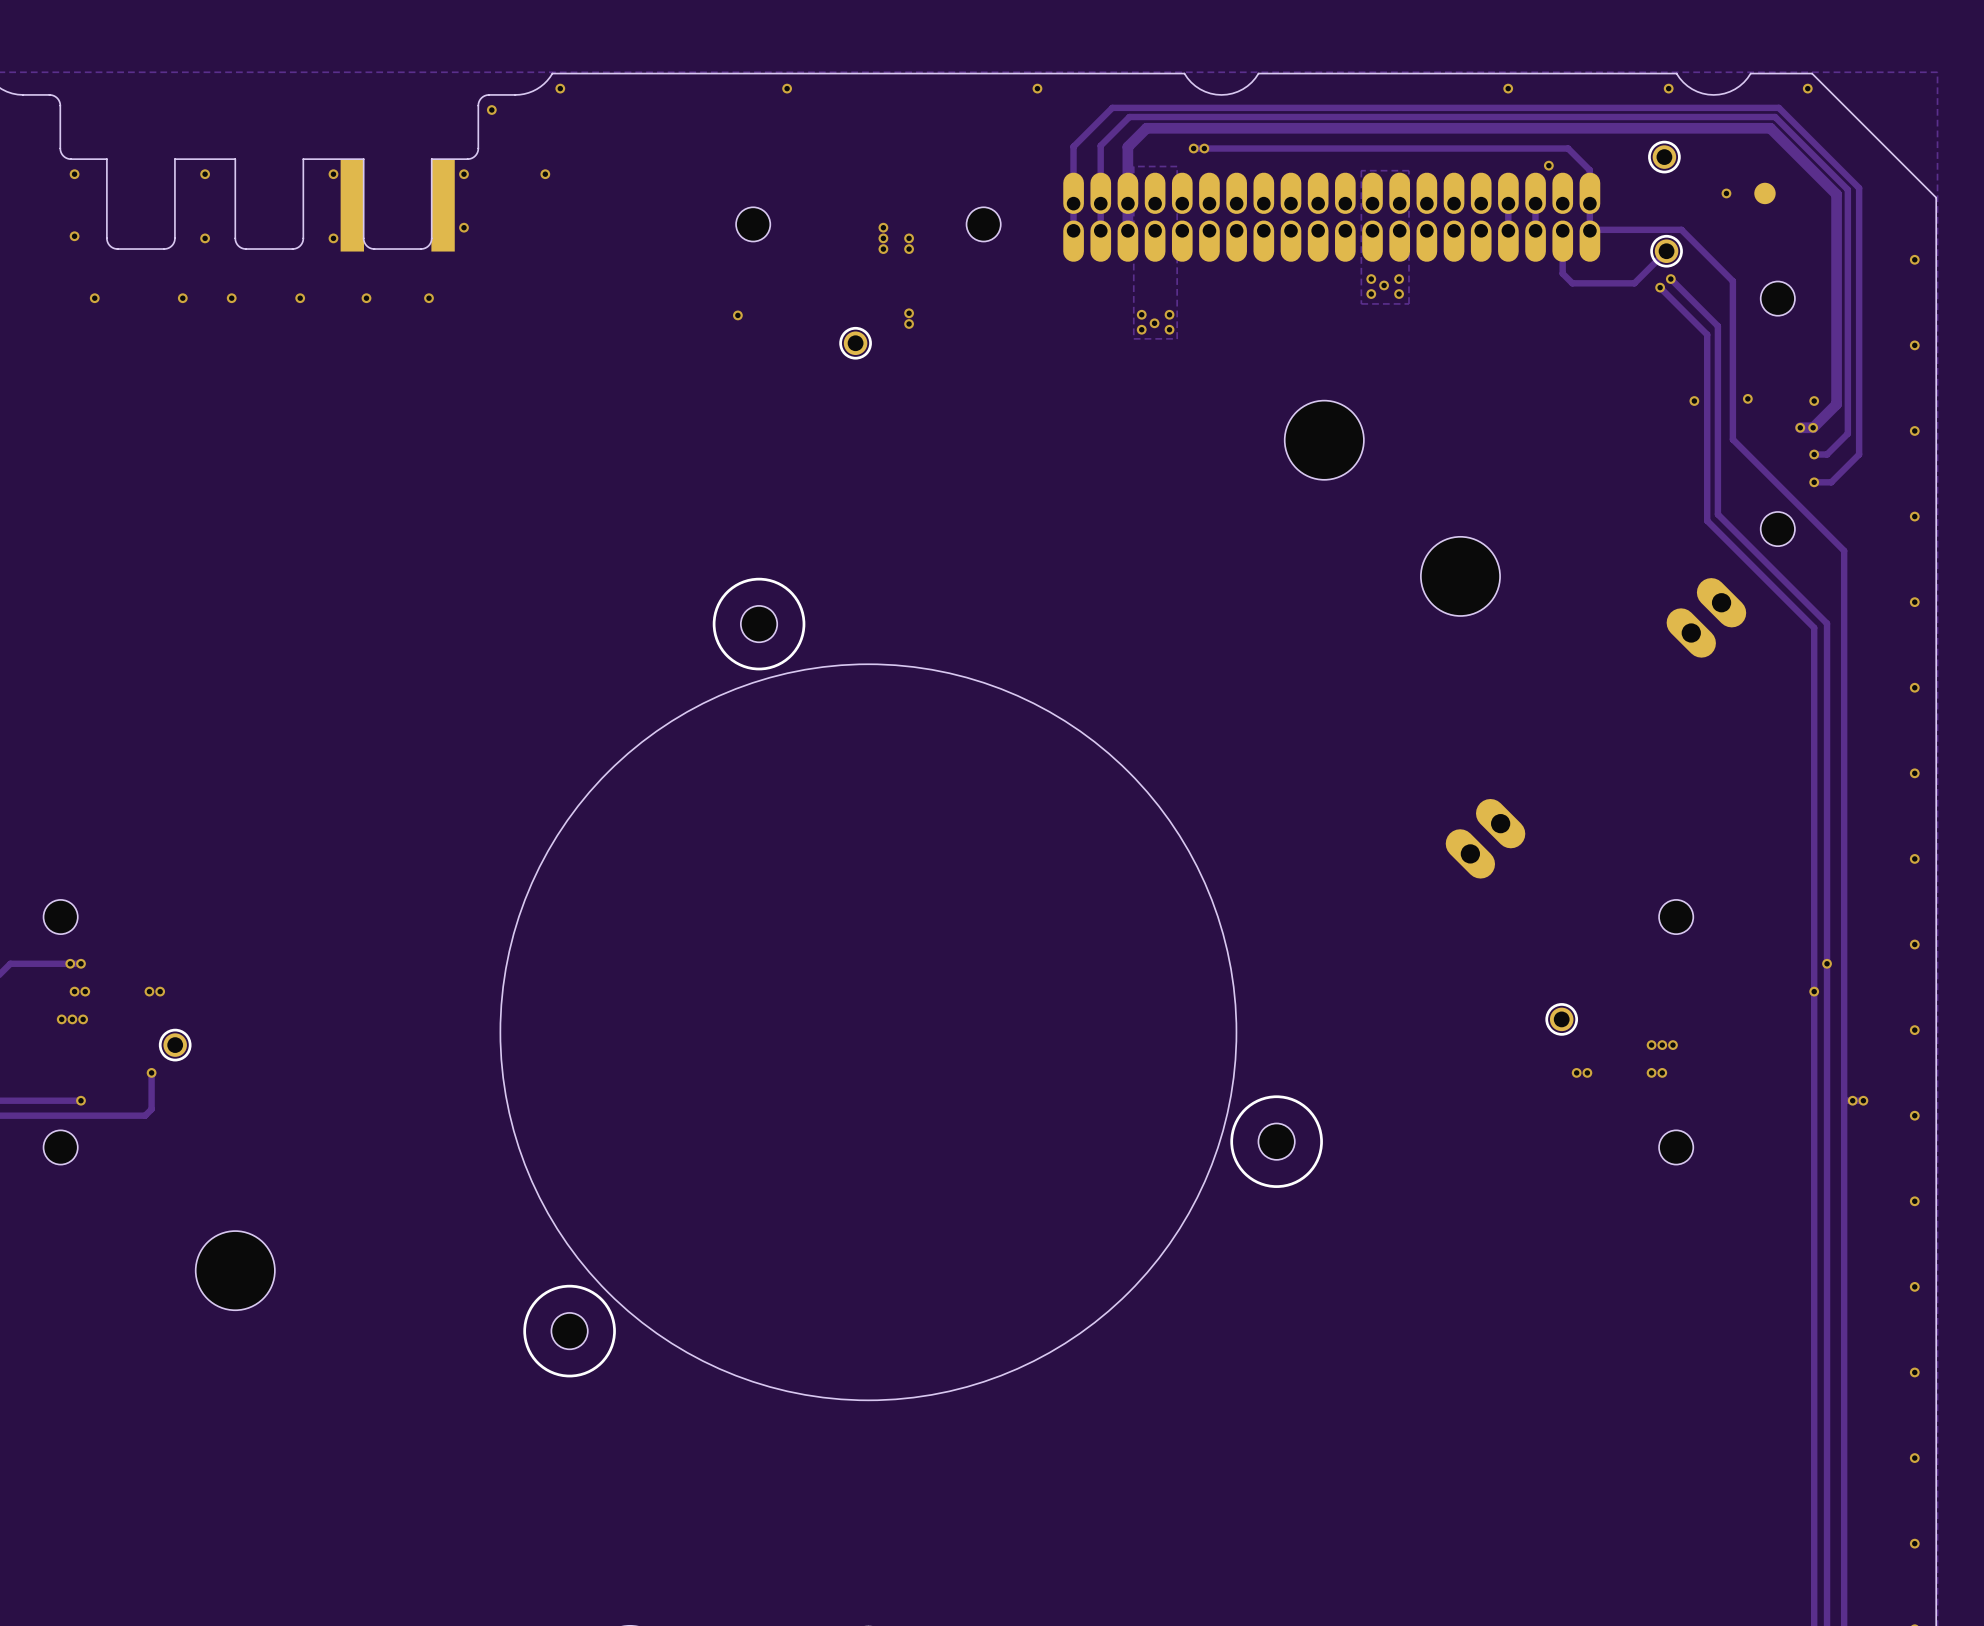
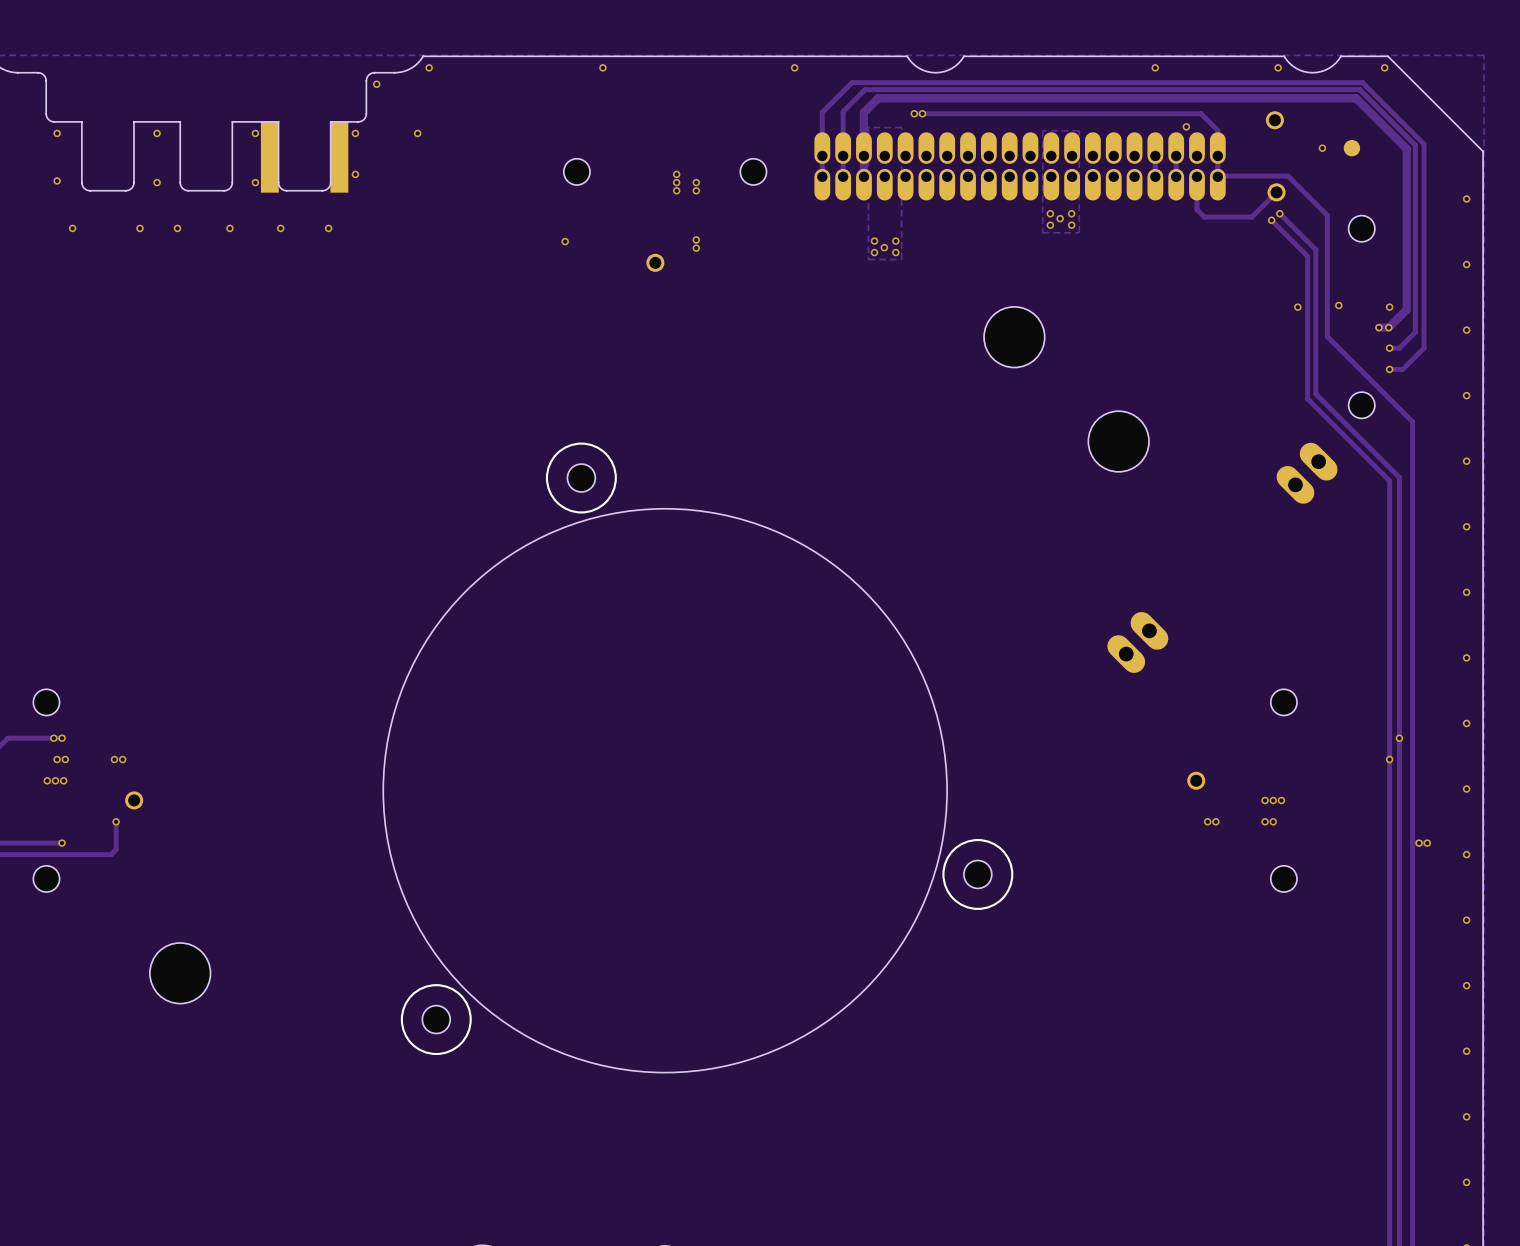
part footprint: [1648, 140, 1681, 174] -> [1265, 111, 1284, 130]
part footprint: [1650, 234, 1683, 268] -> [1267, 183, 1286, 202]
part footprint: [839, 326, 872, 360] -> [646, 253, 665, 272]
part footprint: [1545, 1003, 1579, 1036] -> [1187, 771, 1206, 790]
part footprint: [158, 1028, 192, 1062] -> [125, 791, 144, 810]

